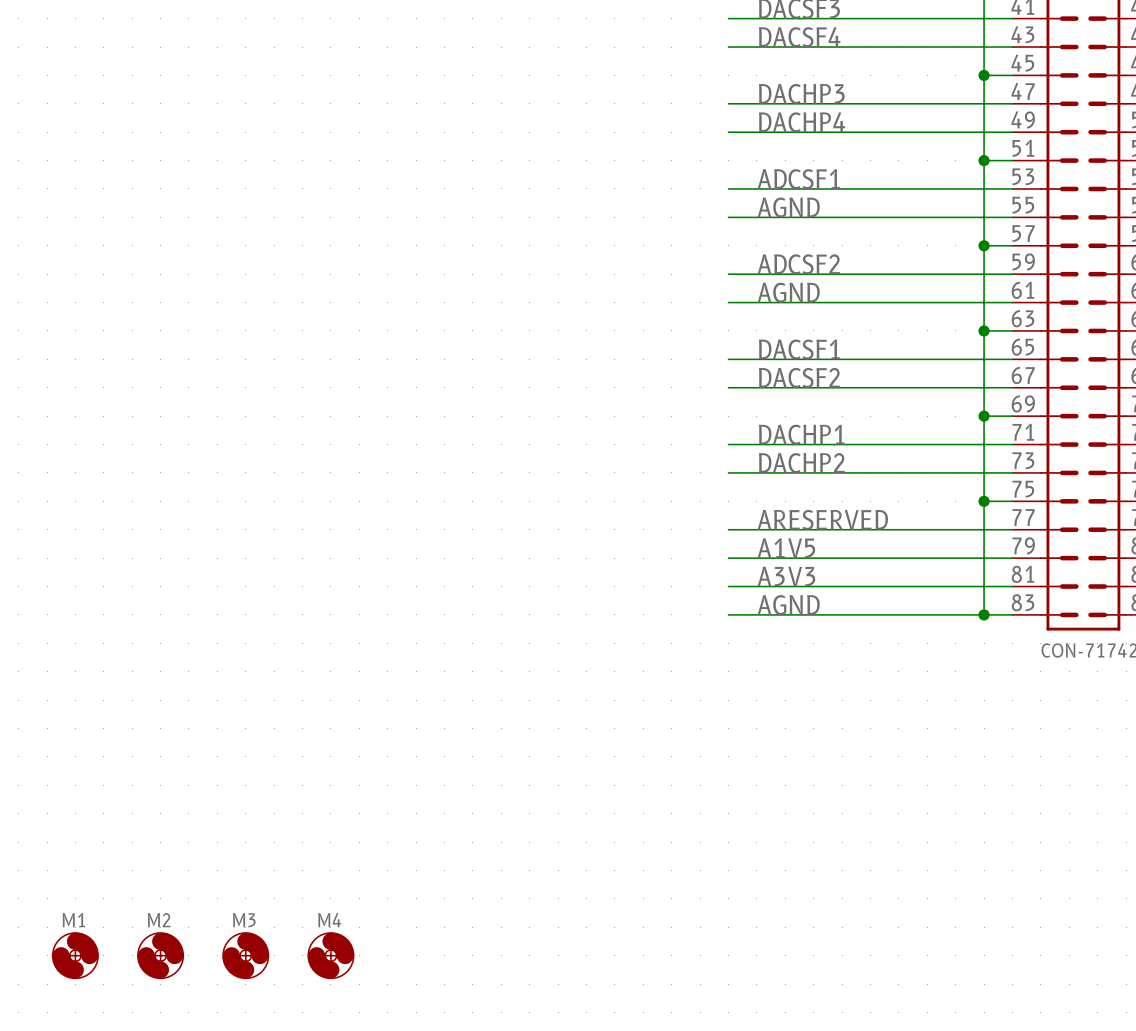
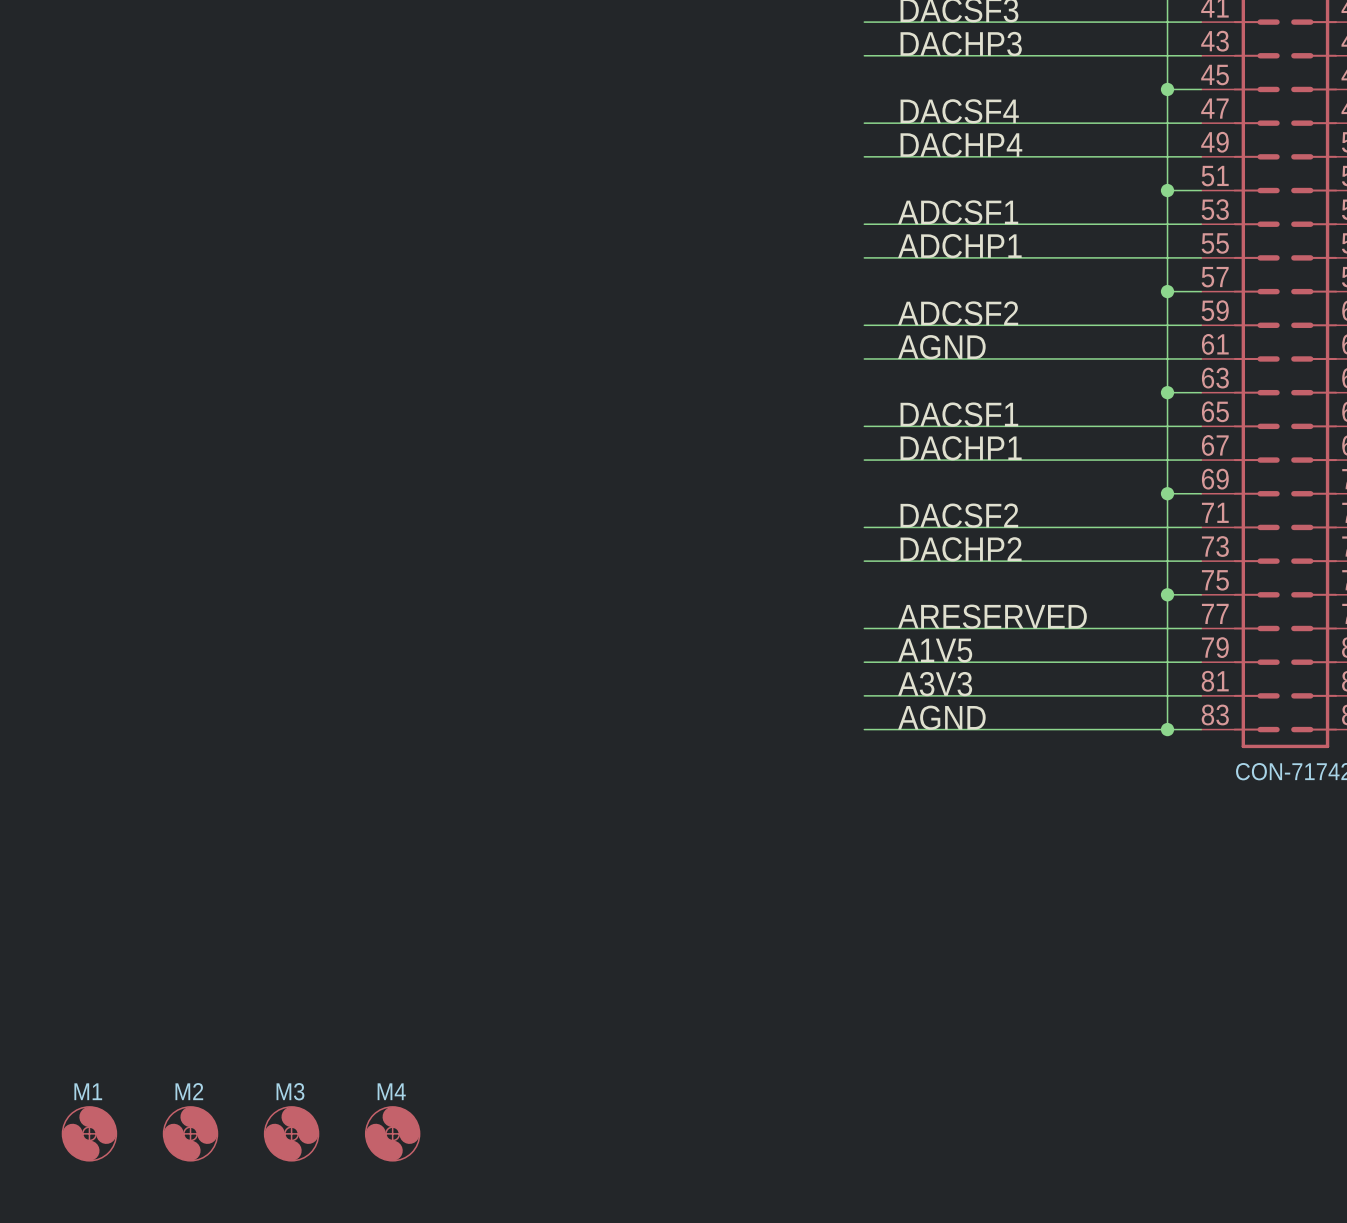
label: DACSF4 (799, 37) -> DACHP3 (961, 43)
label: DACHP3 (801, 93) -> DACSF4 (959, 111)
label: AGND (788, 207) -> ADCHP1 (959, 246)
label: DACSF2 (799, 377) -> DACHP1 (961, 448)
label: DACHP1 (801, 434) -> DACSF2 (959, 515)

